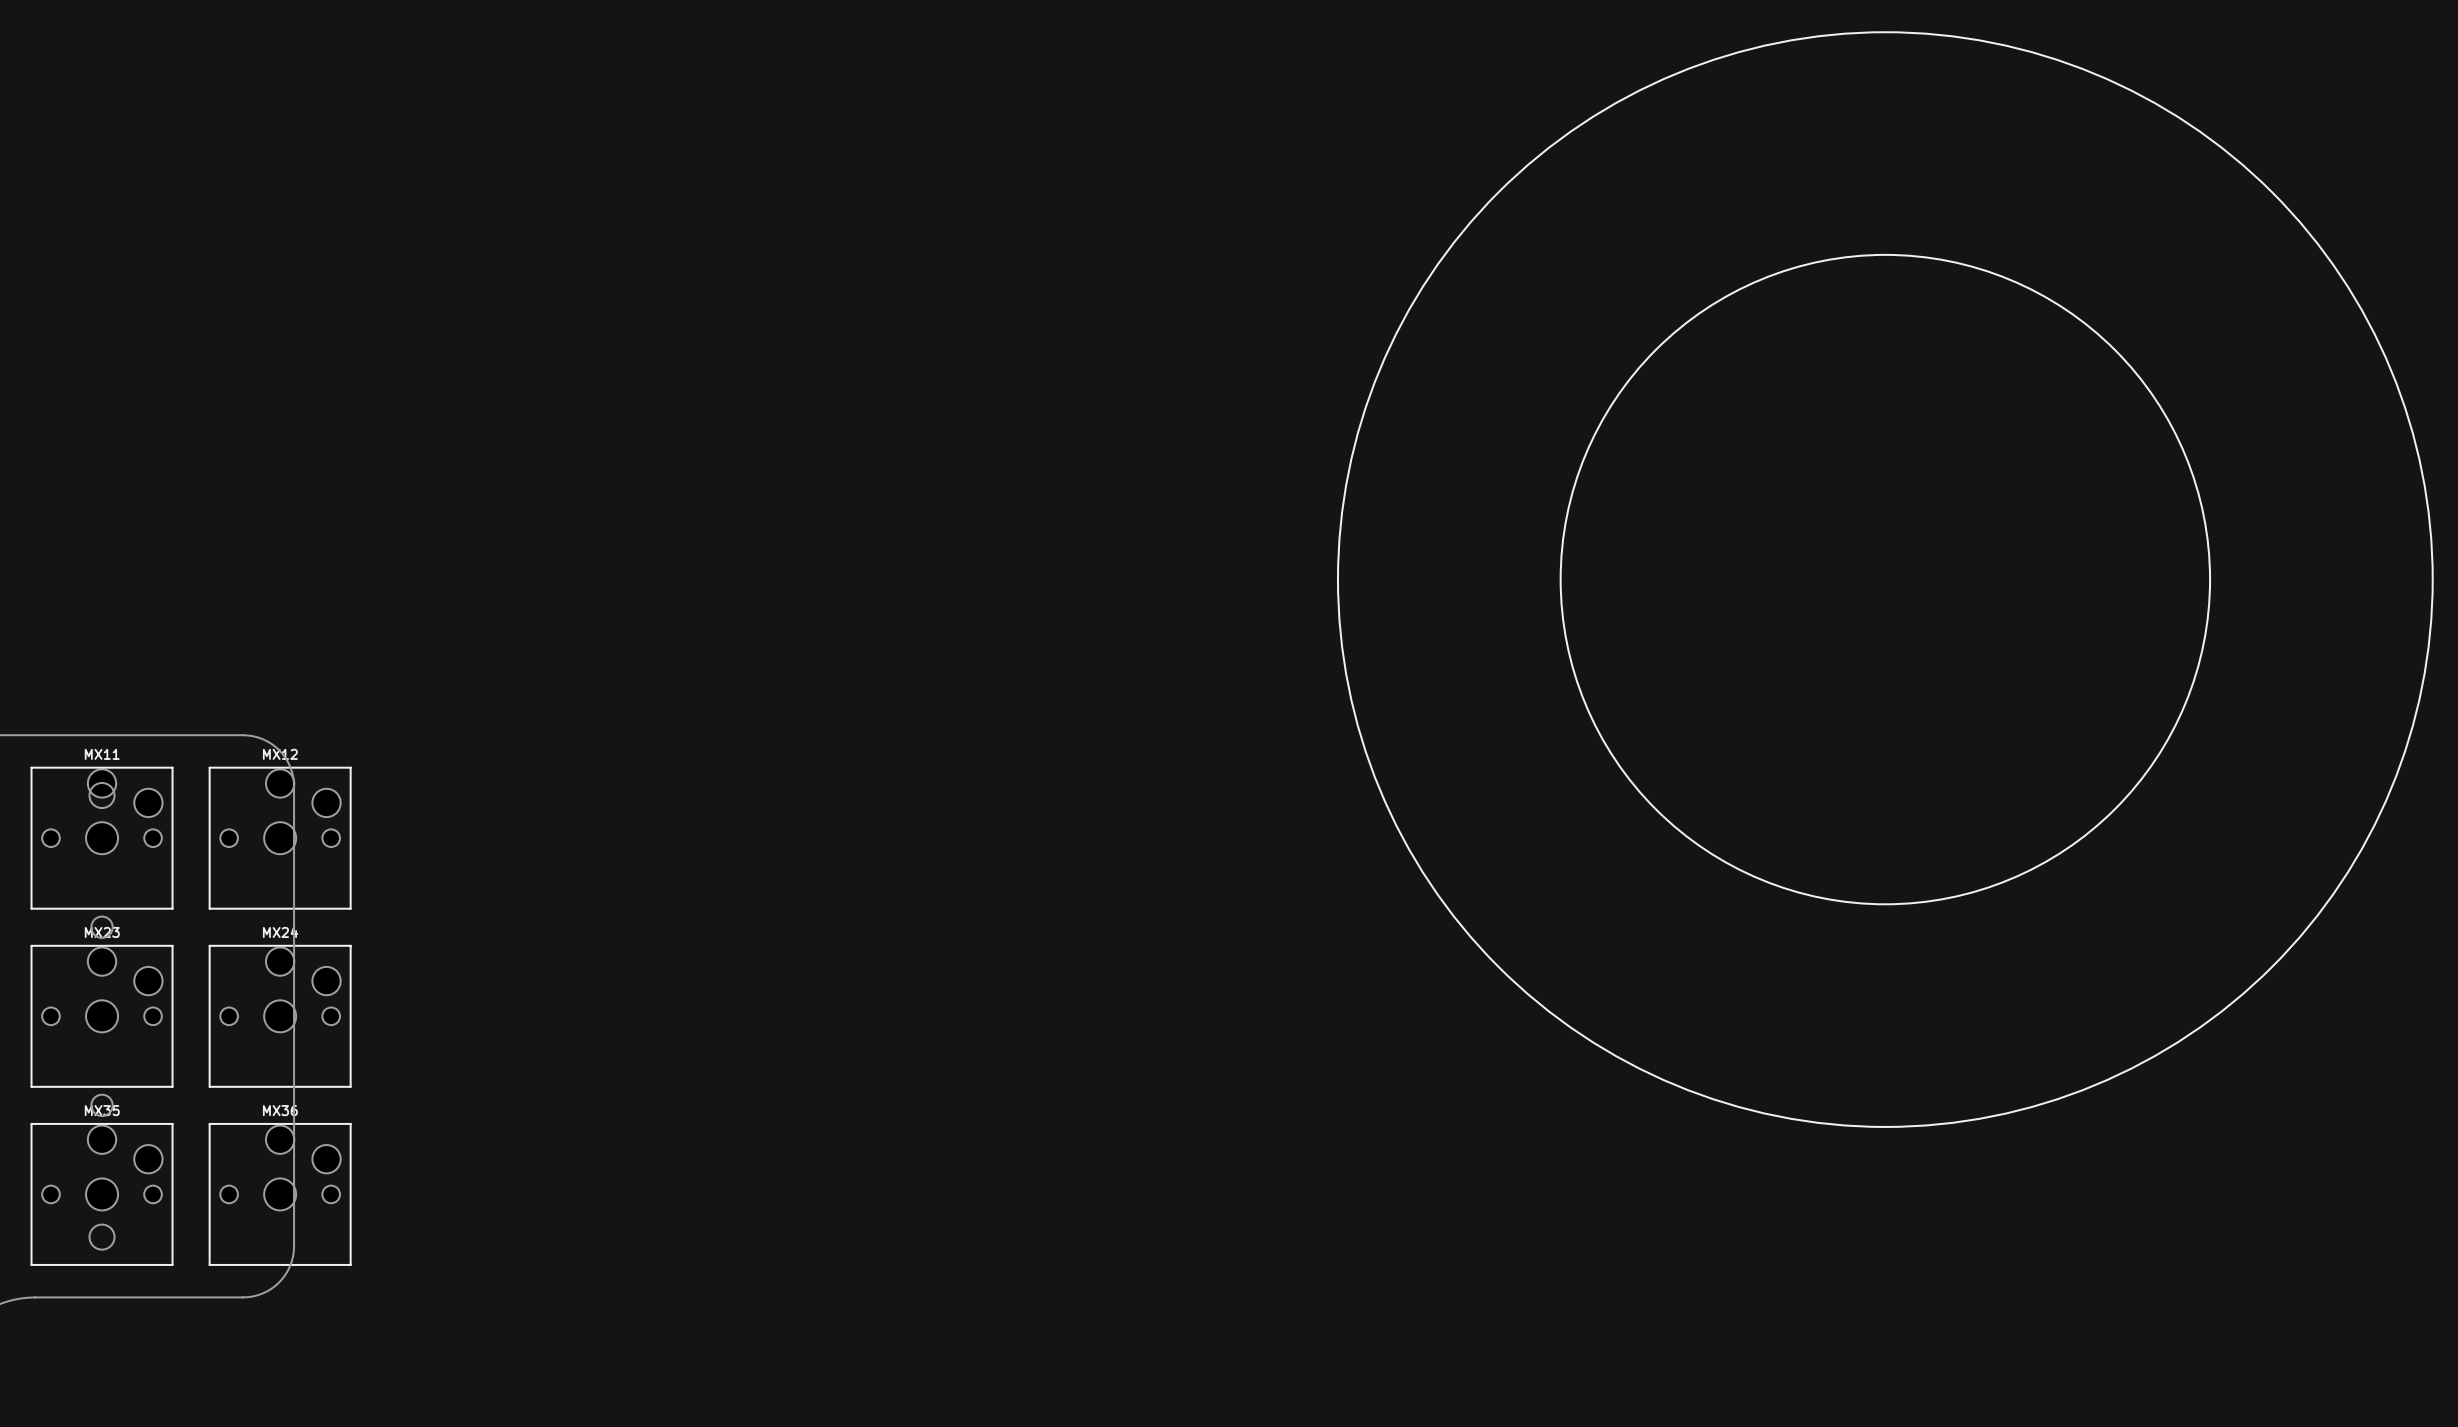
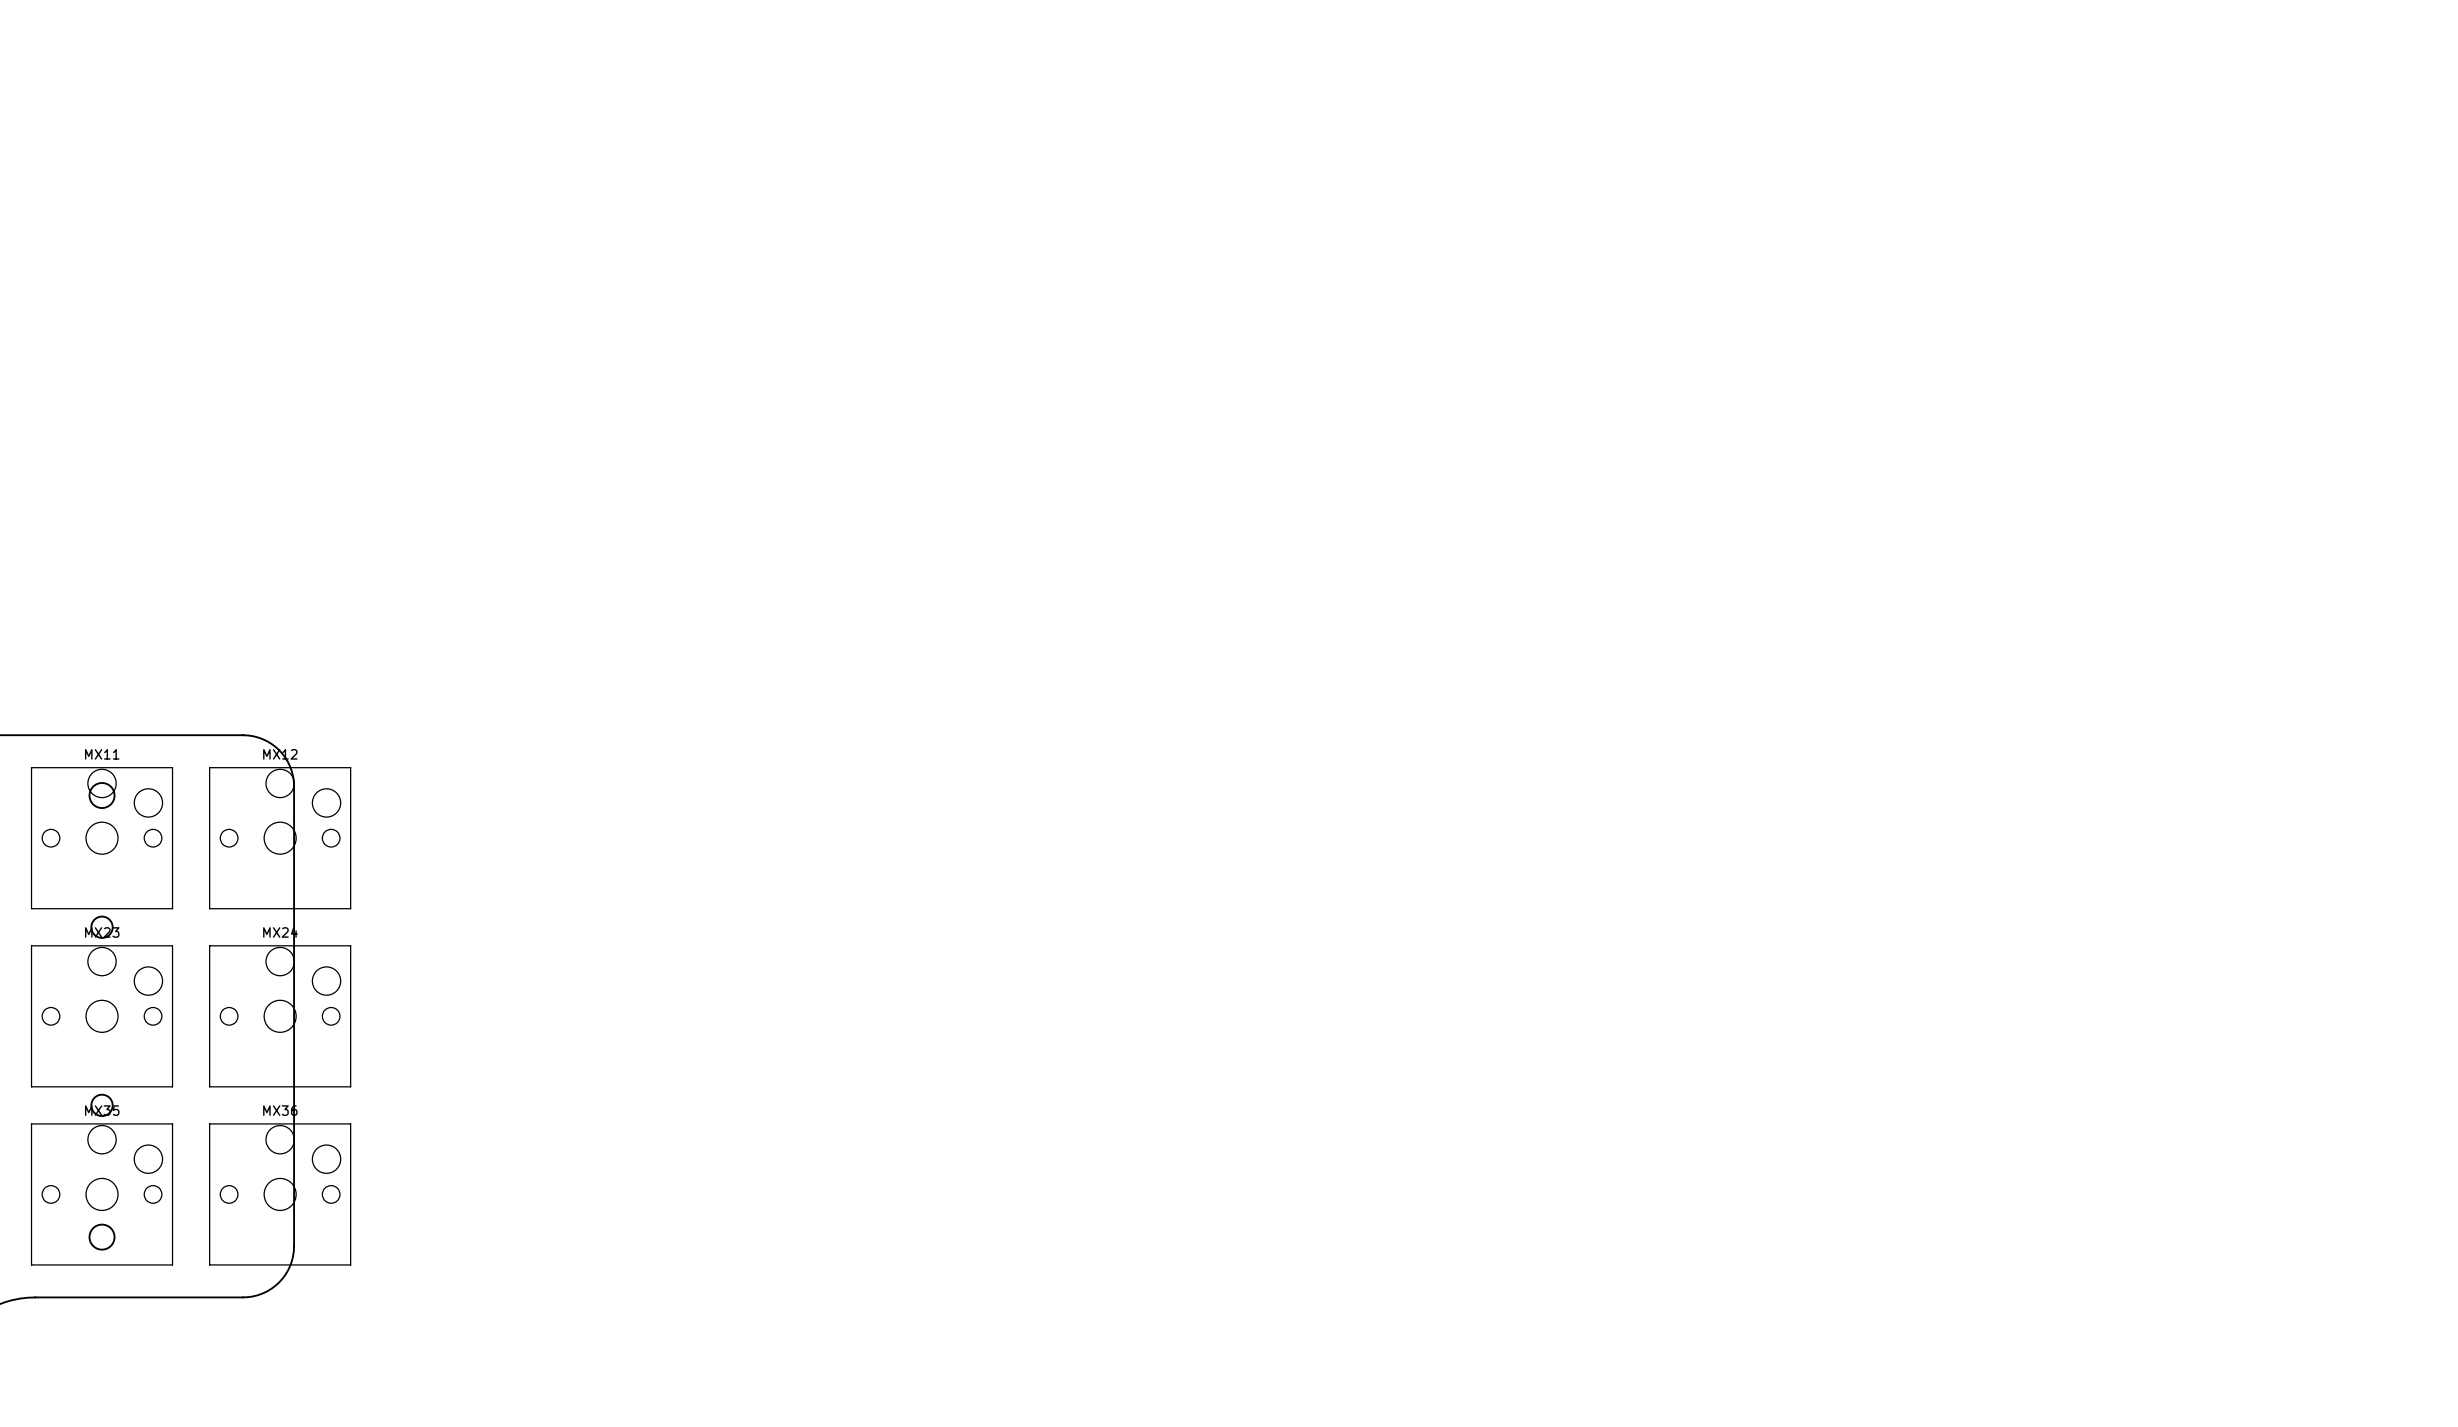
drawing: [1337, 31, 2434, 1128] -> none

